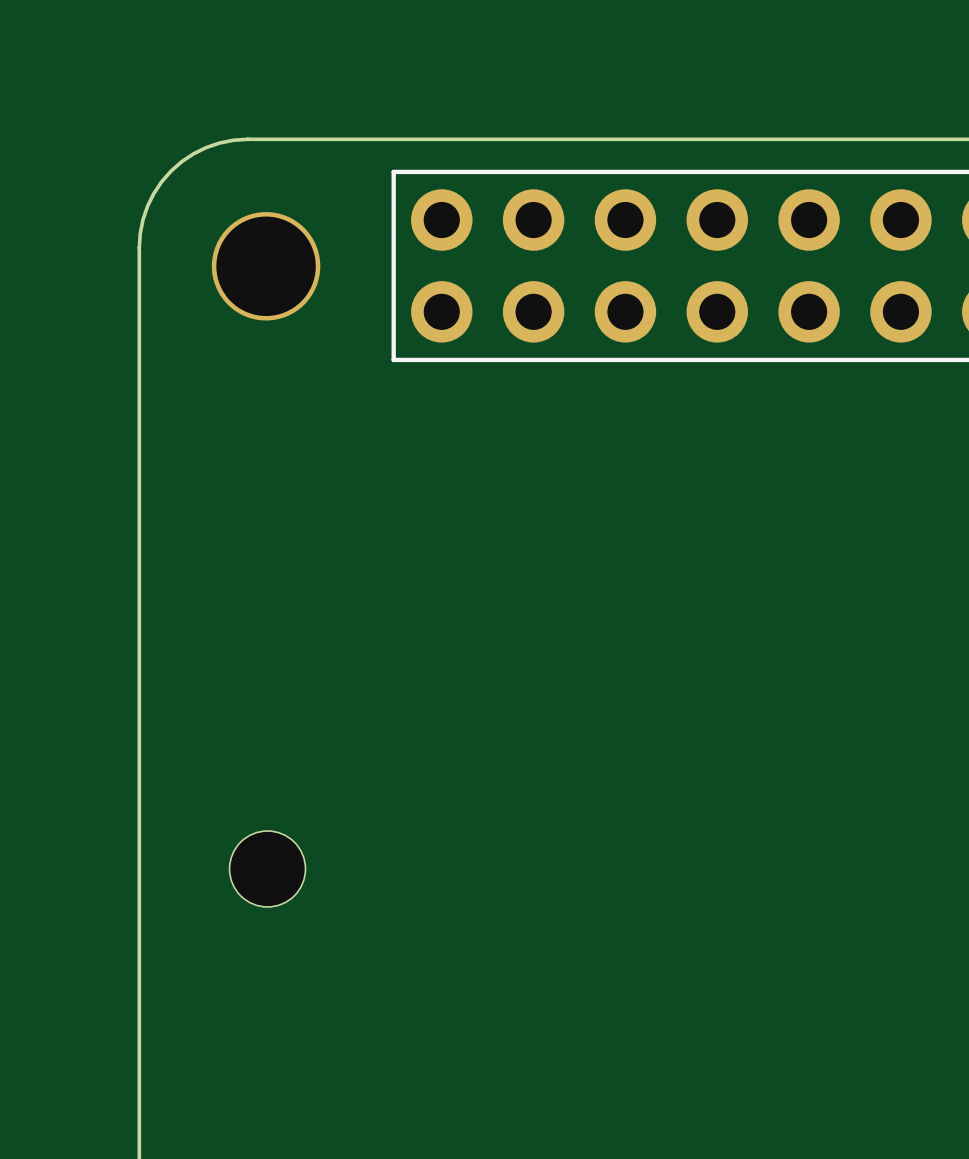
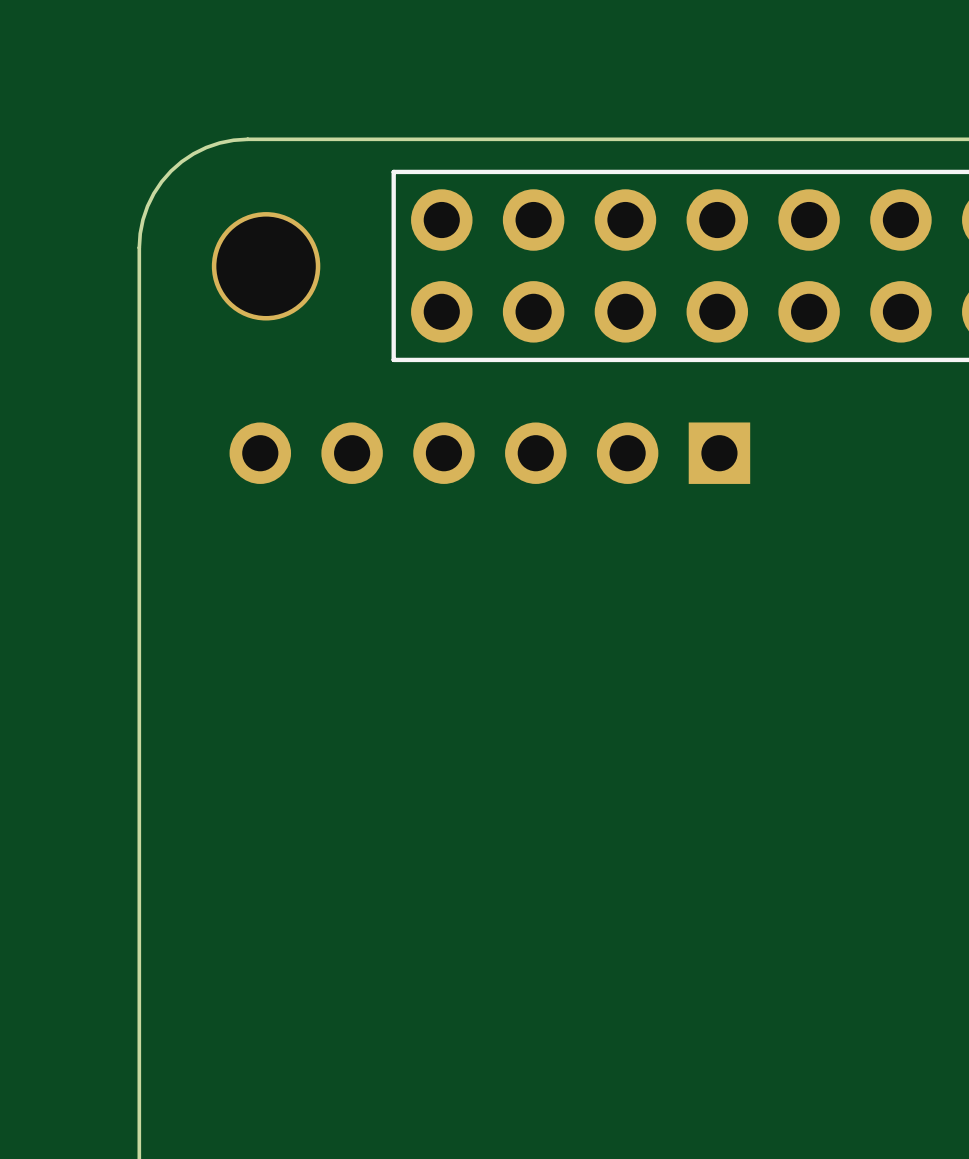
part: none -> (489, 453)
part: (267, 868) -> none

